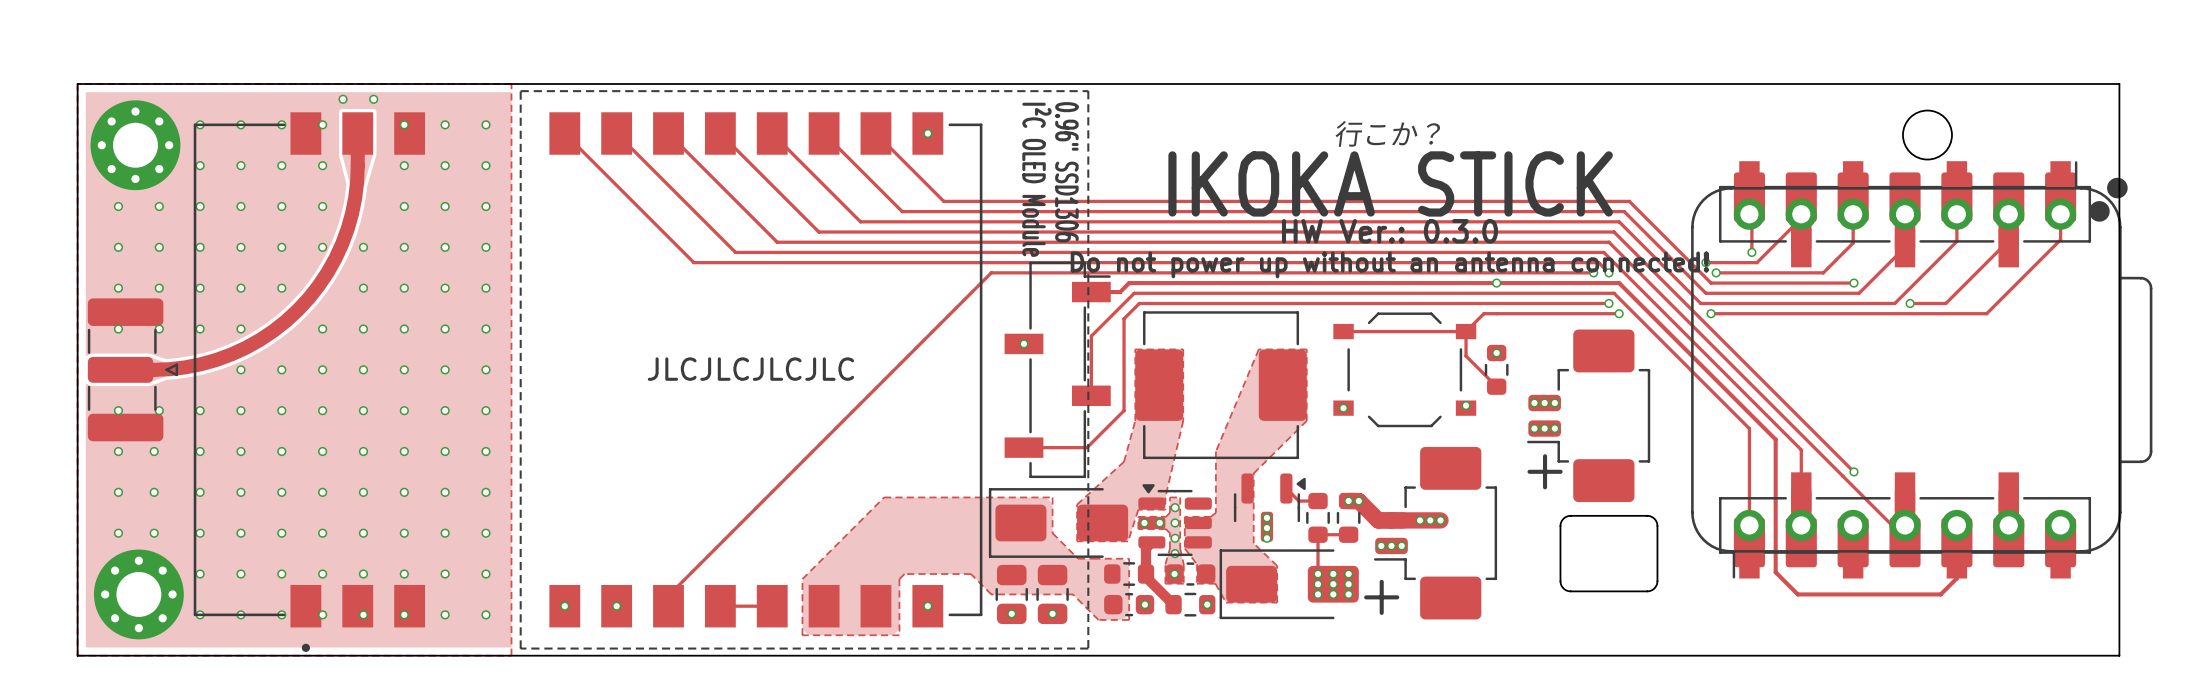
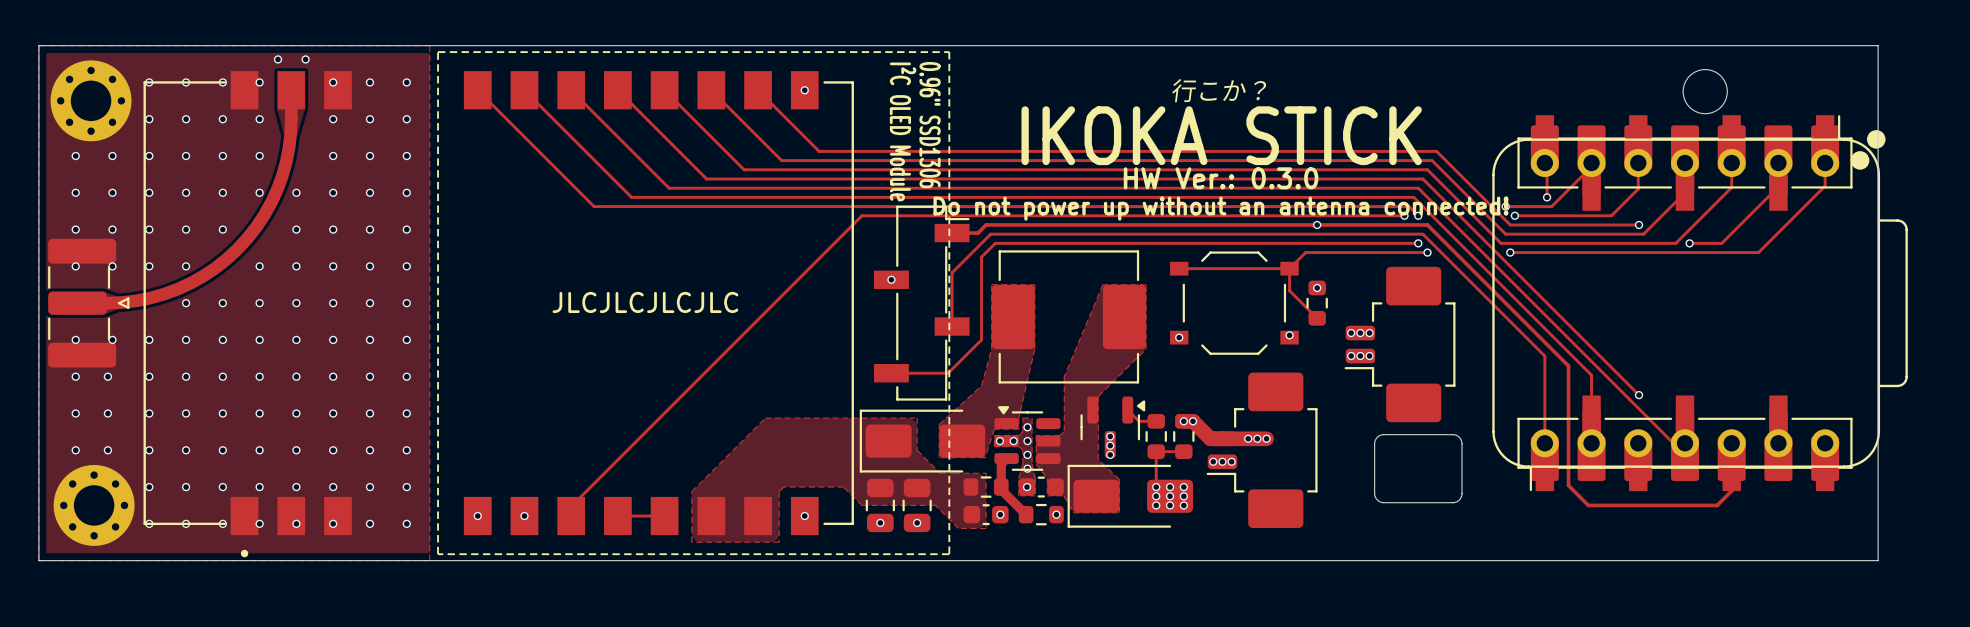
text: + (1545, 471) -> none
text: + (1381, 597) -> none

